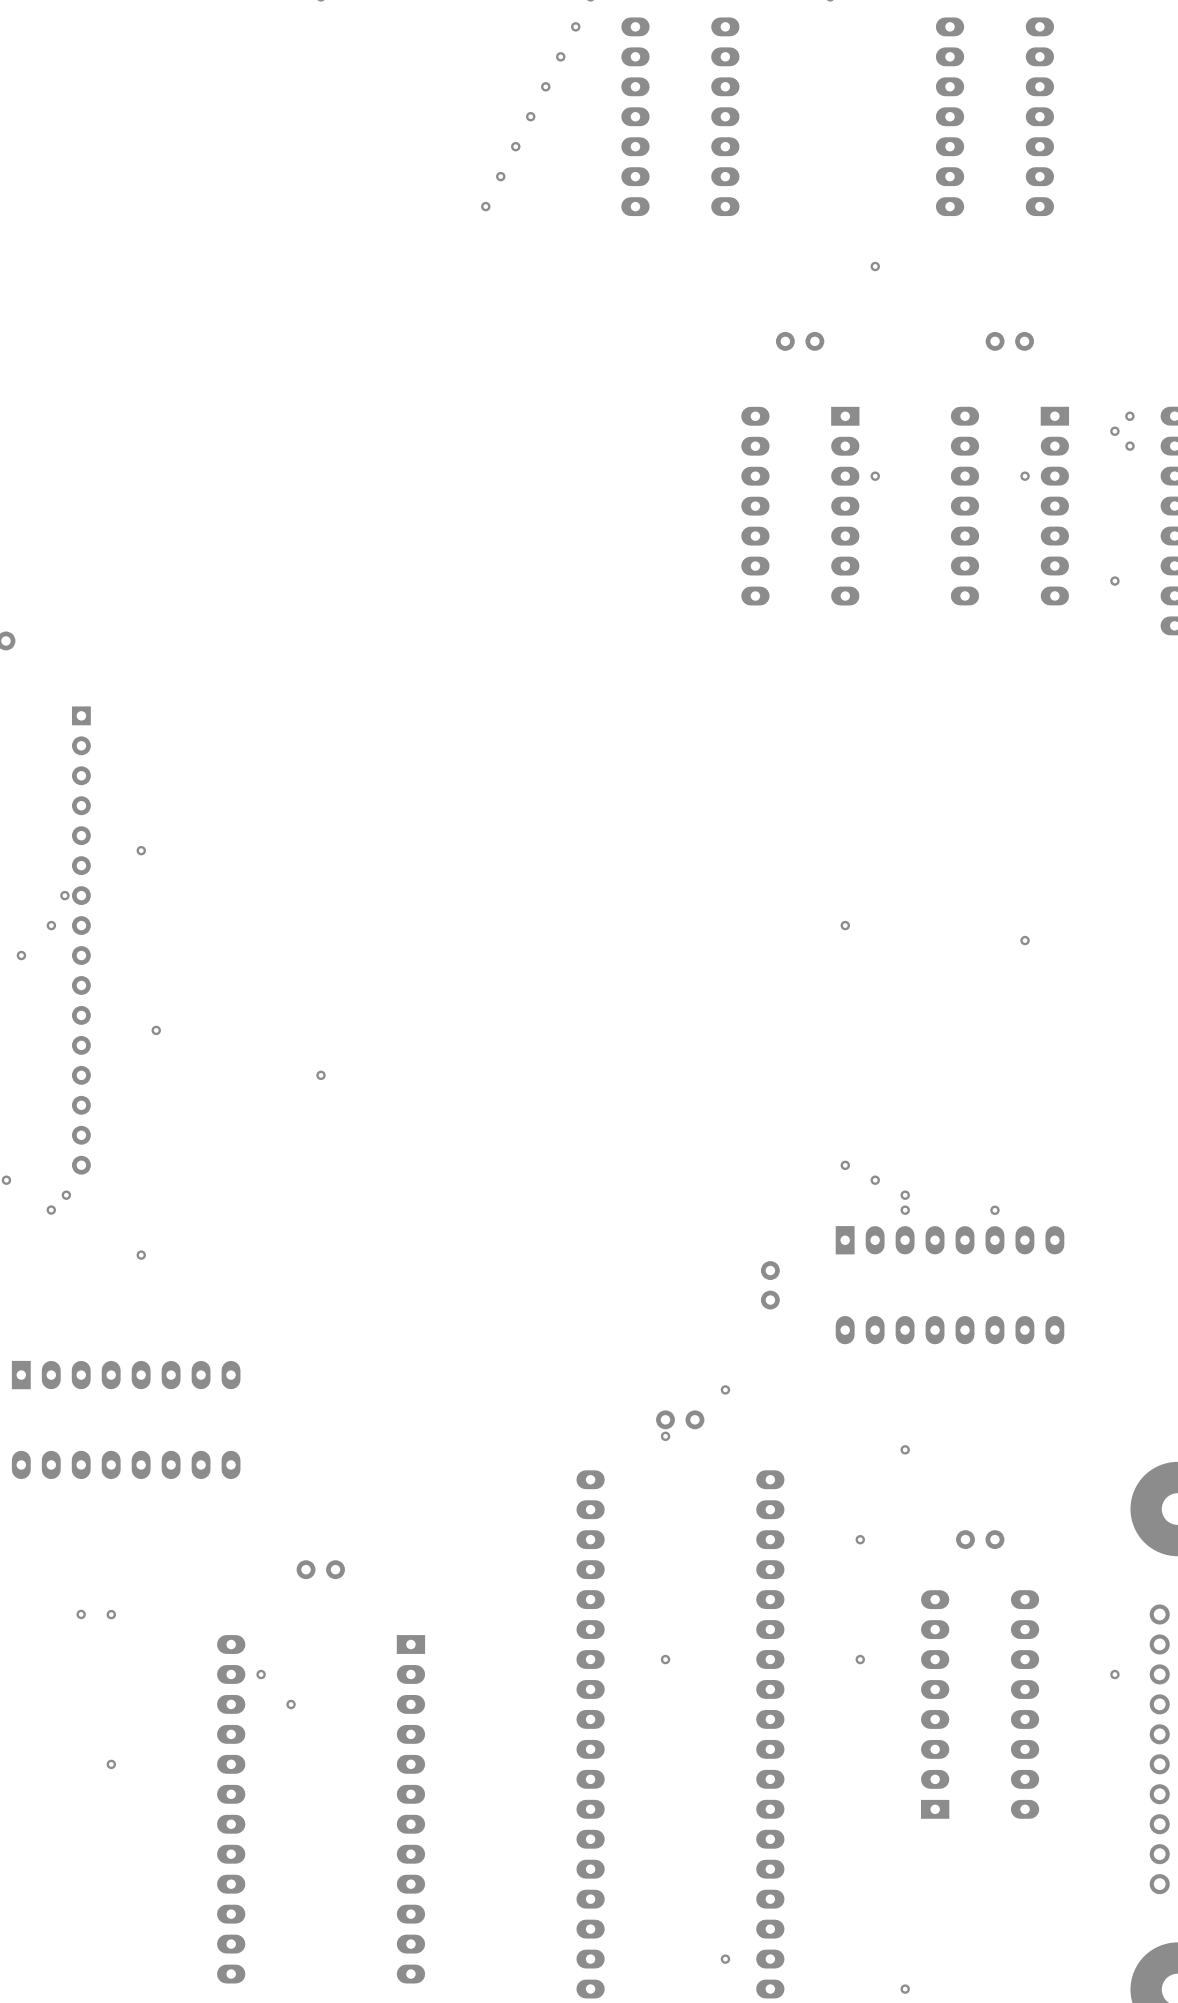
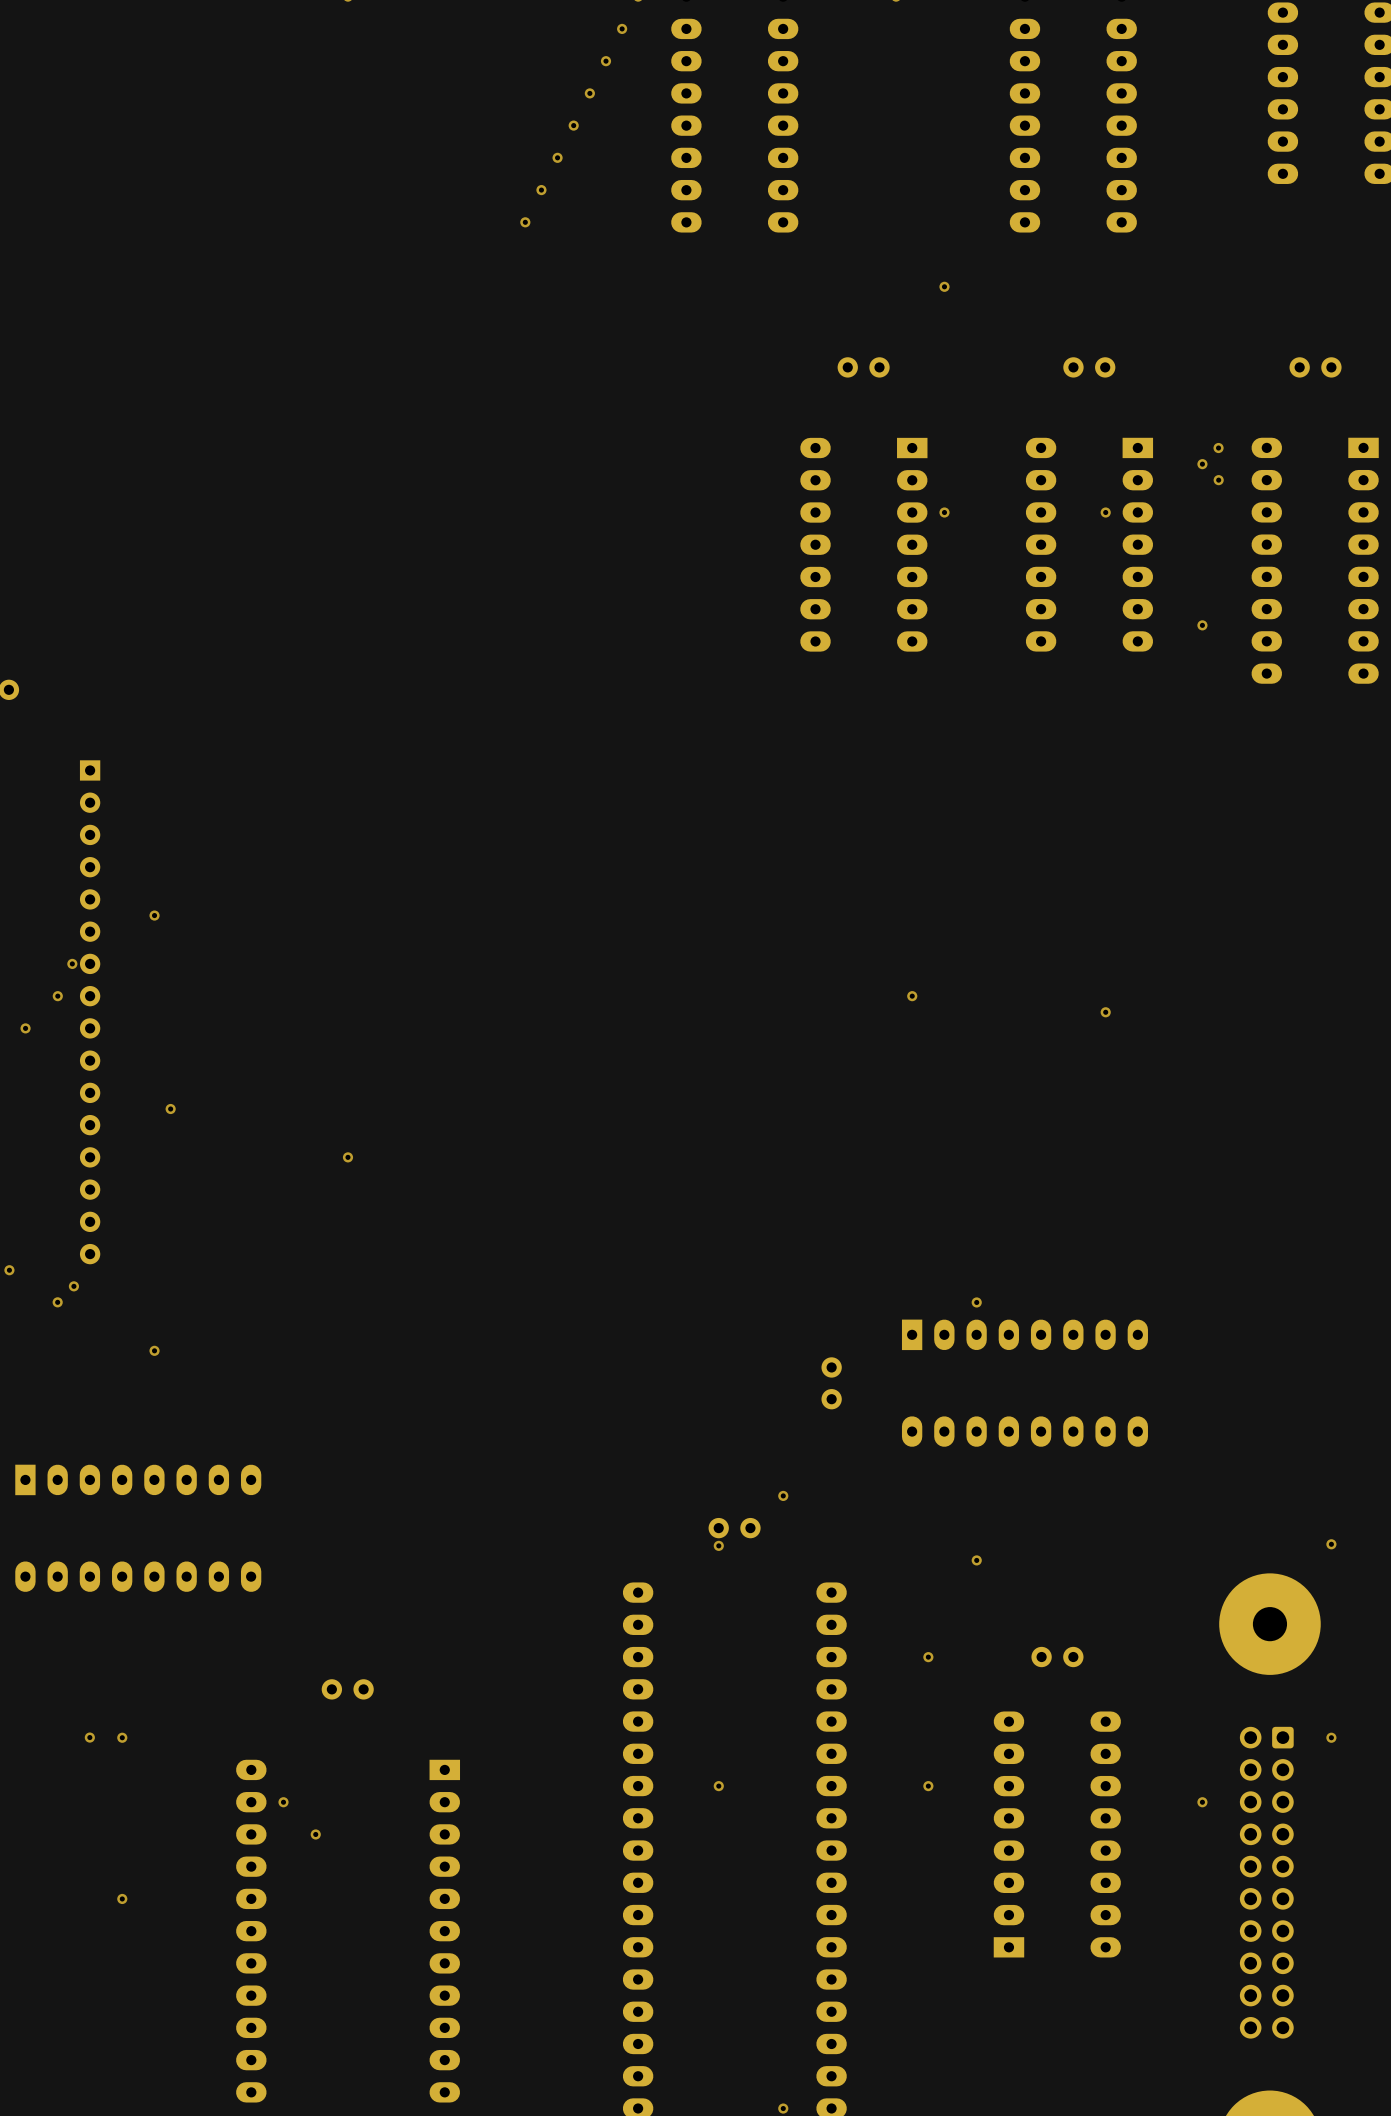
via: (845, 1165) -> none
via: (875, 1180) -> none
via: (905, 1195) -> none
via: (994, 1210) -> none

